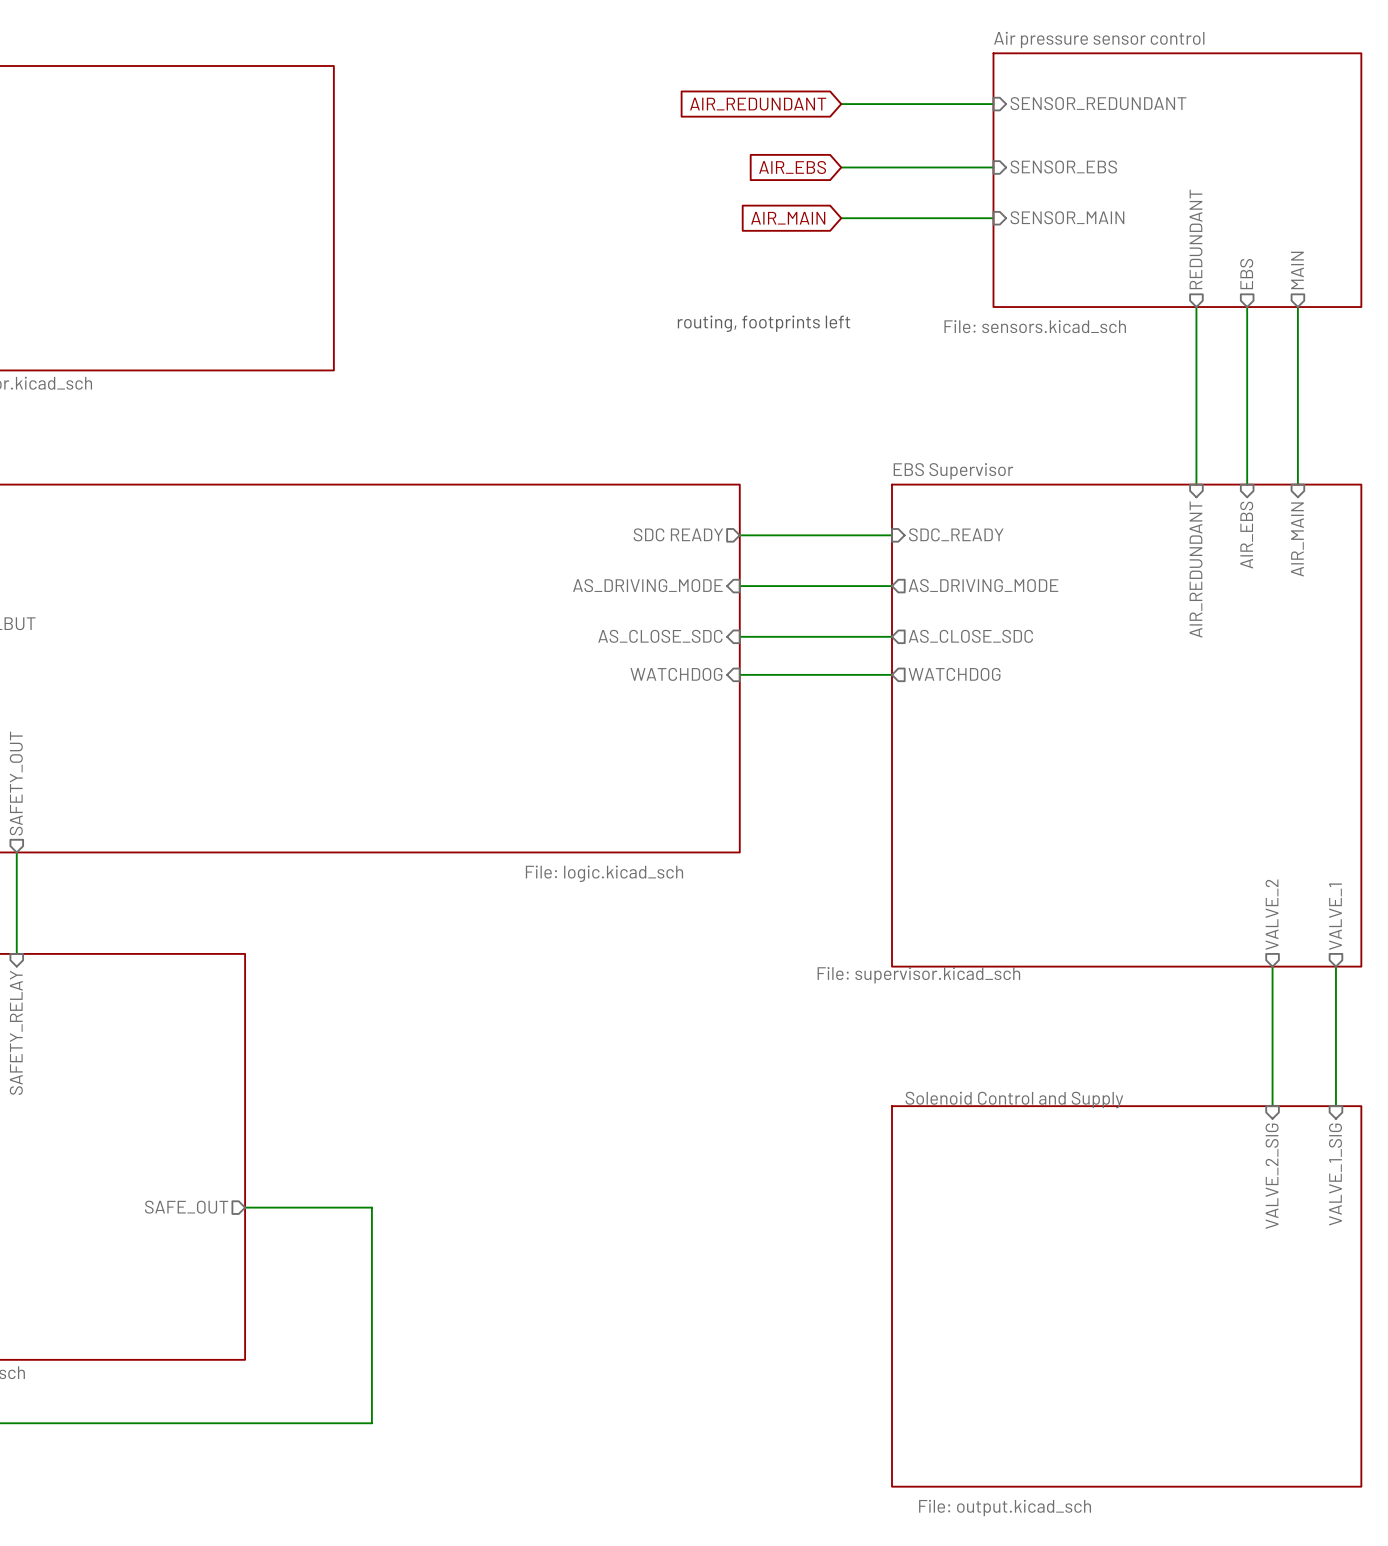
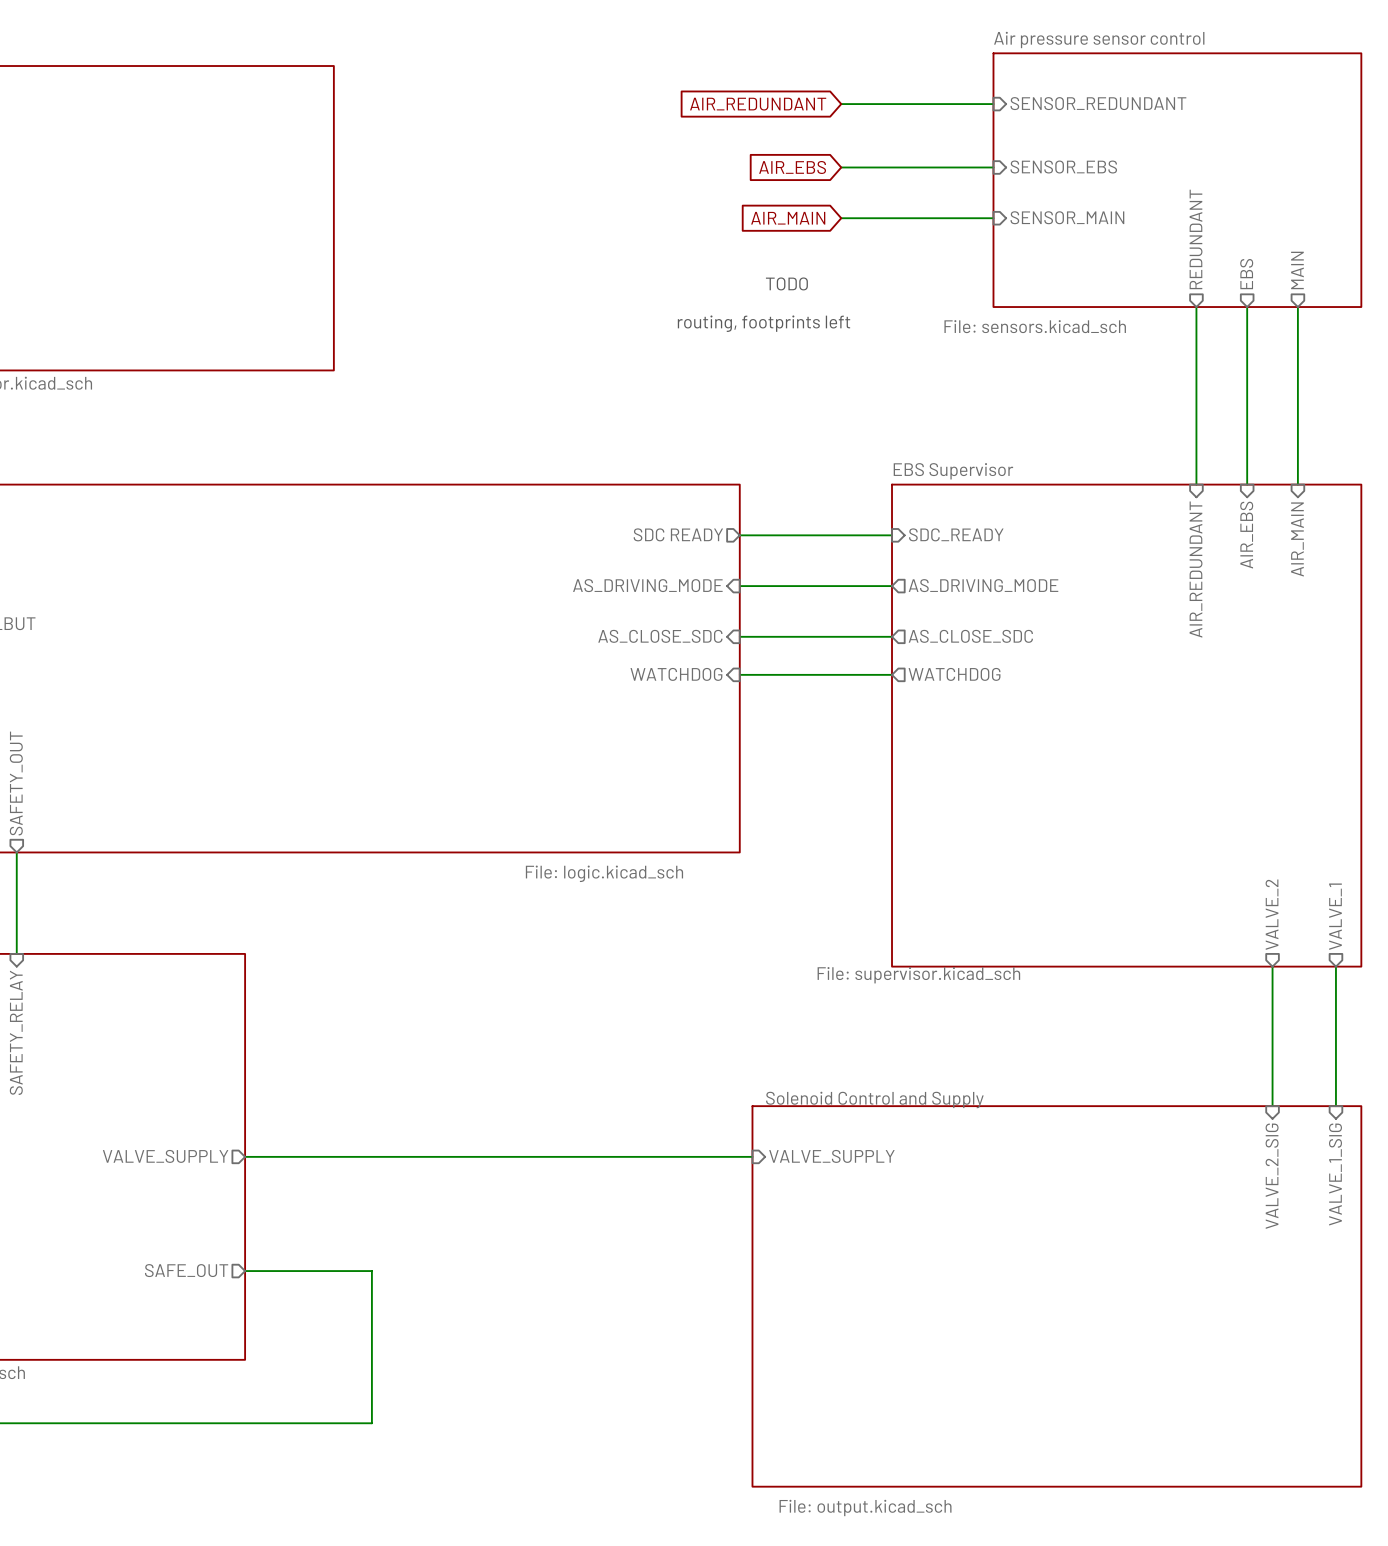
text: none -> TODO (786, 283)
sheet pin: none -> VALVE_SUPPLY (165, 1156)
wire: none -> (245, 1156) (752, 1156)
sheet pin: none -> VALVE_SUPPLY (831, 1156)
sheet pin position: SAFE_OUT (186, 1207) -> SAFE_OUT (186, 1270)
wire: (245, 1207) (371, 1207) (371, 1271) -> (245, 1271) (371, 1271)
sheet Solenoid Control and Supply: none -> File: output.kicad_sch (1056, 1296)
sheet Solenoid Control and Supply: File: output.kicad_sch (1126, 1296) -> none

